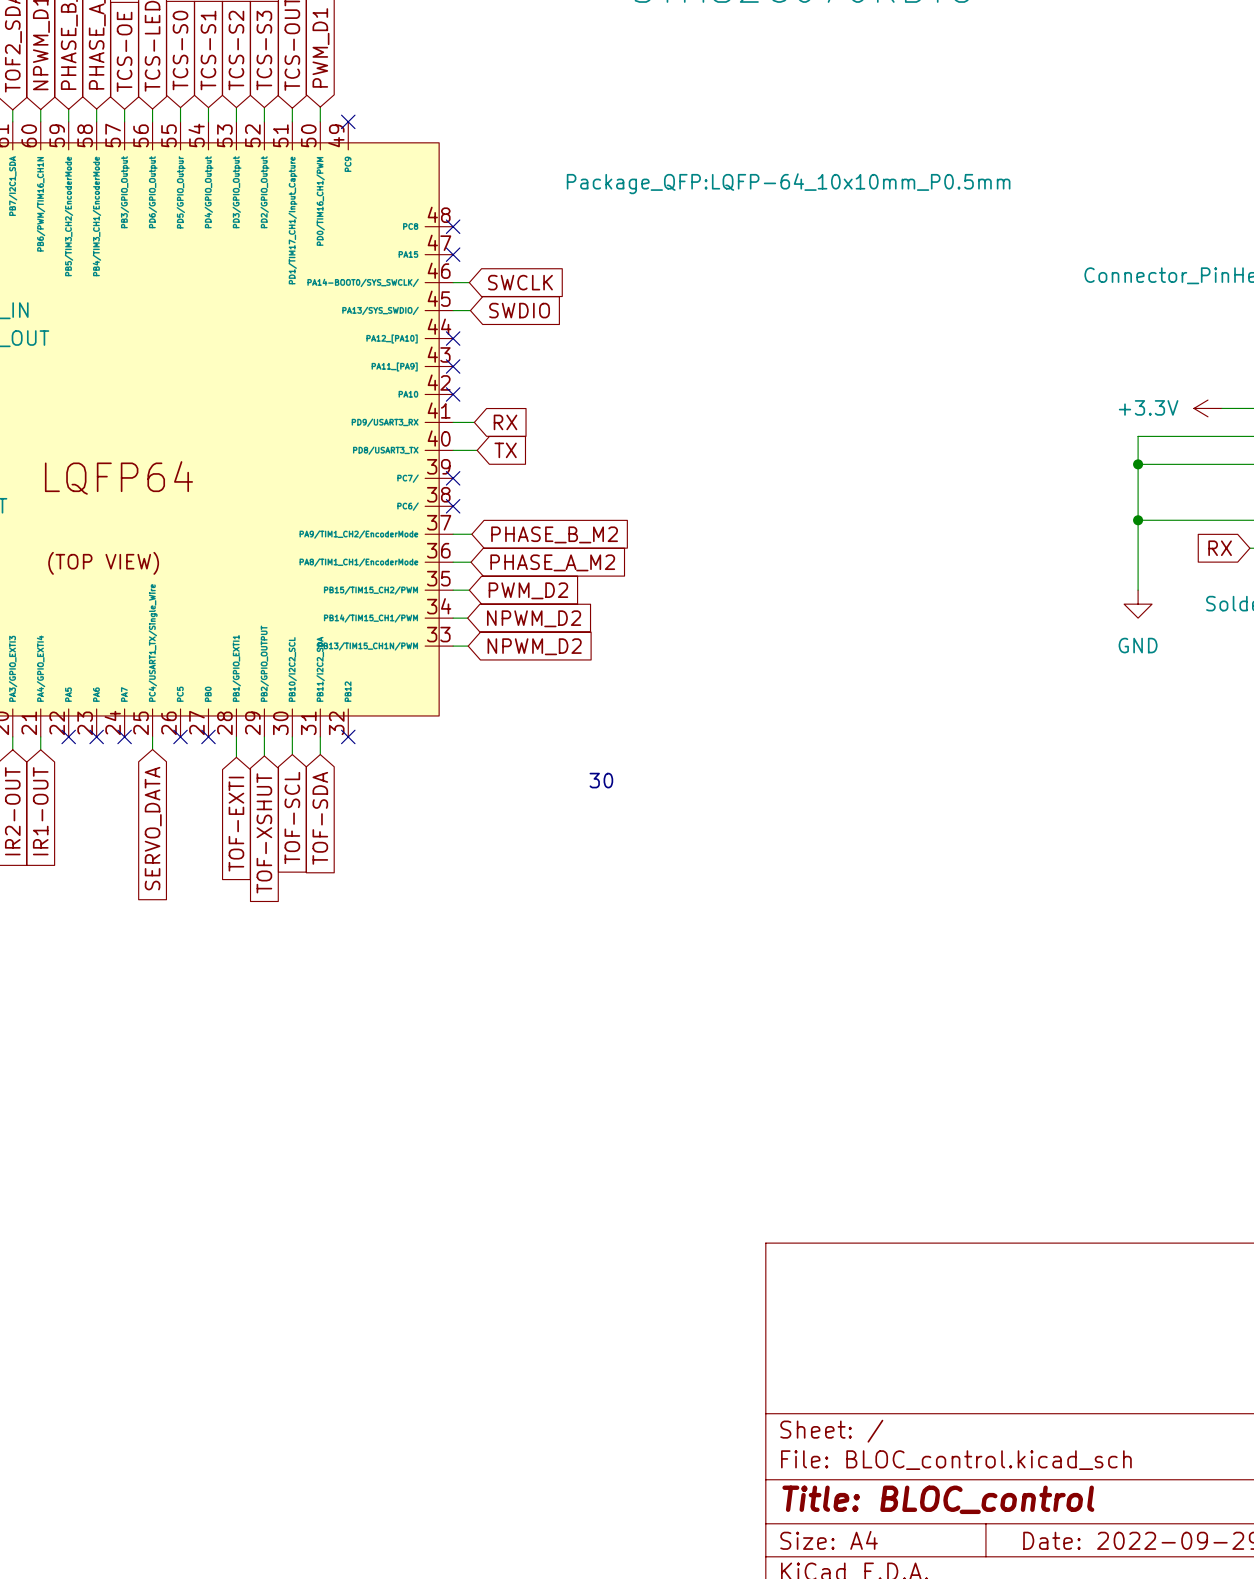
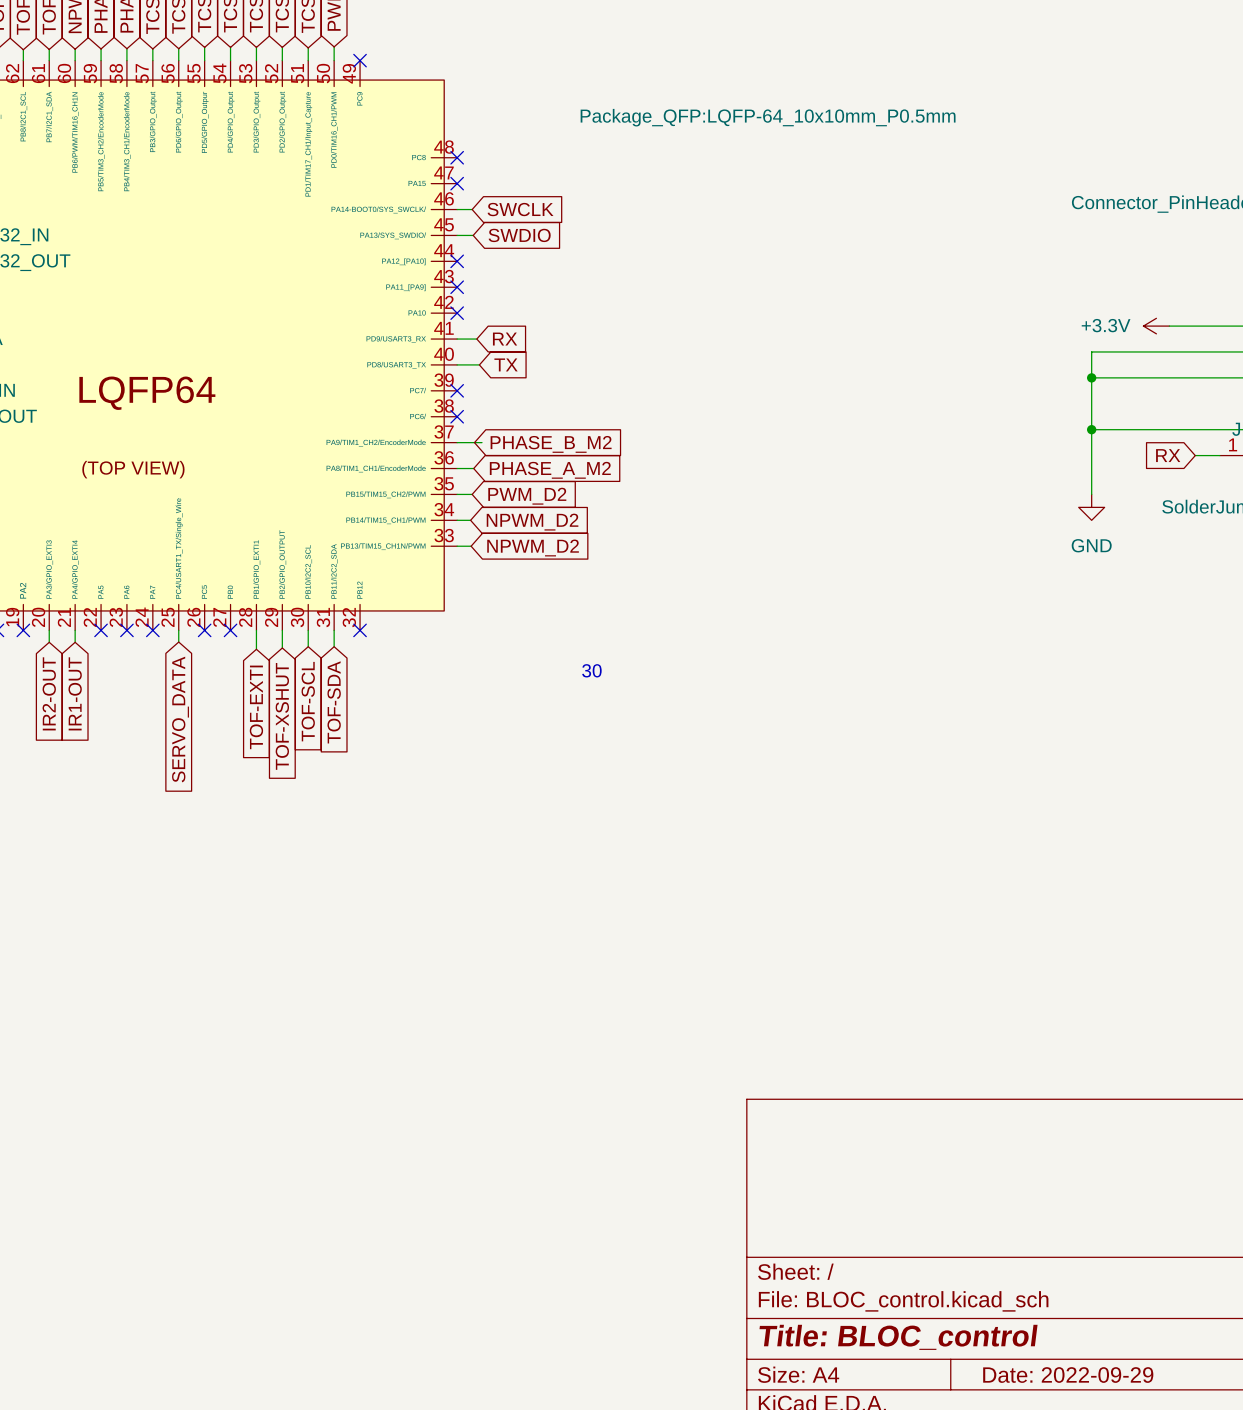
wire: none -> (474, 442) (482, 442)

